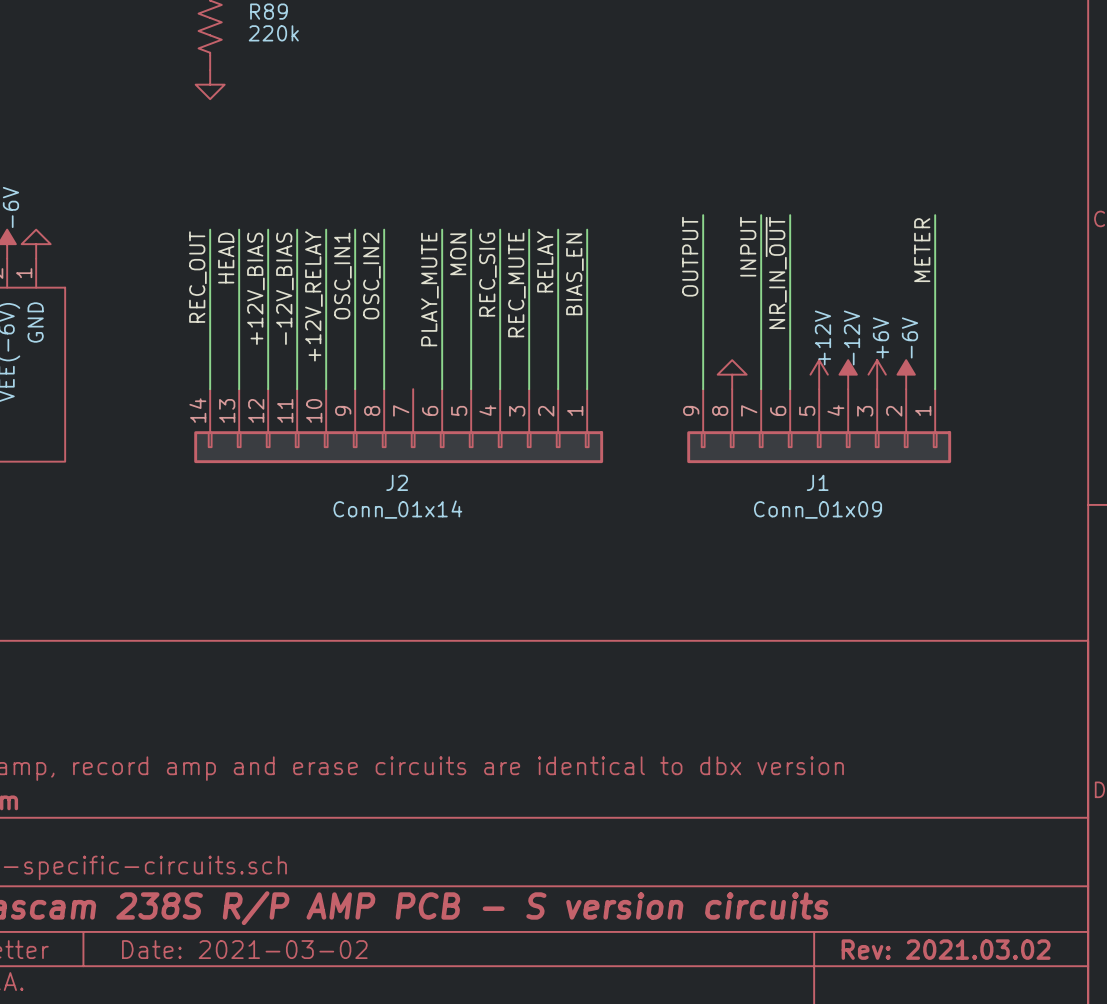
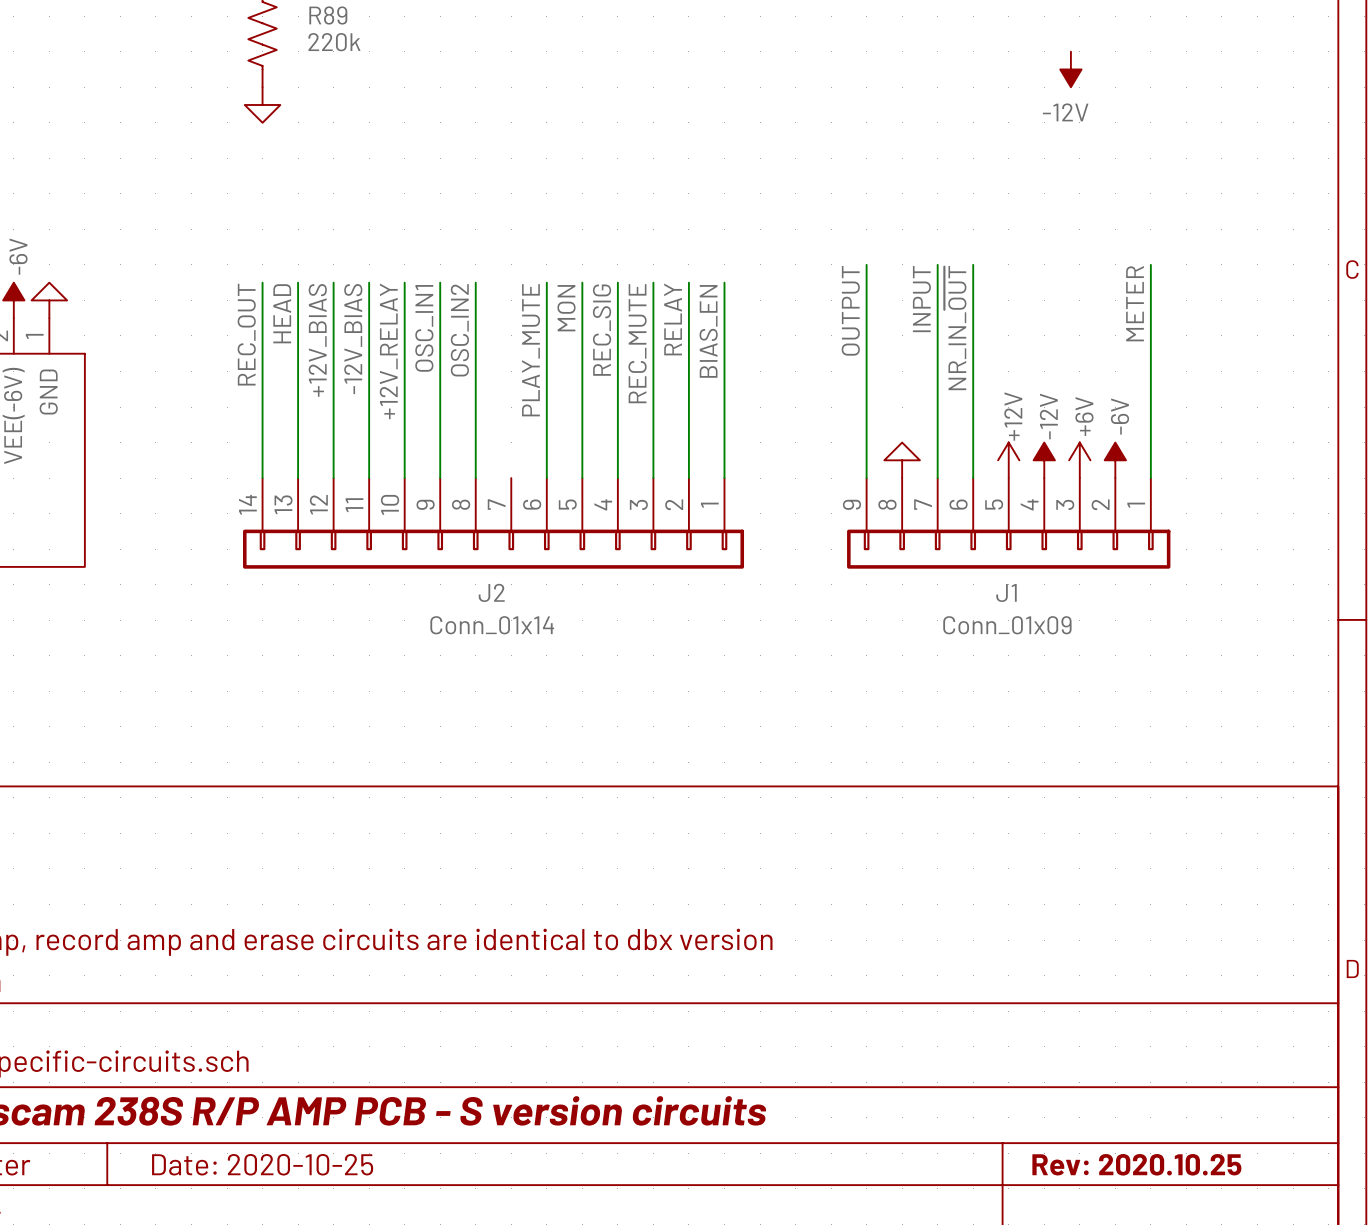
power symbol: none -> -12V (1070, 69)
title block: Date: 2021-03-02 (244, 949) -> Date: 2020-10-25 (262, 1164)
title block: Rev: 2021.03.02 (946, 949) -> Rev: 2020.10.25 (1136, 1164)

